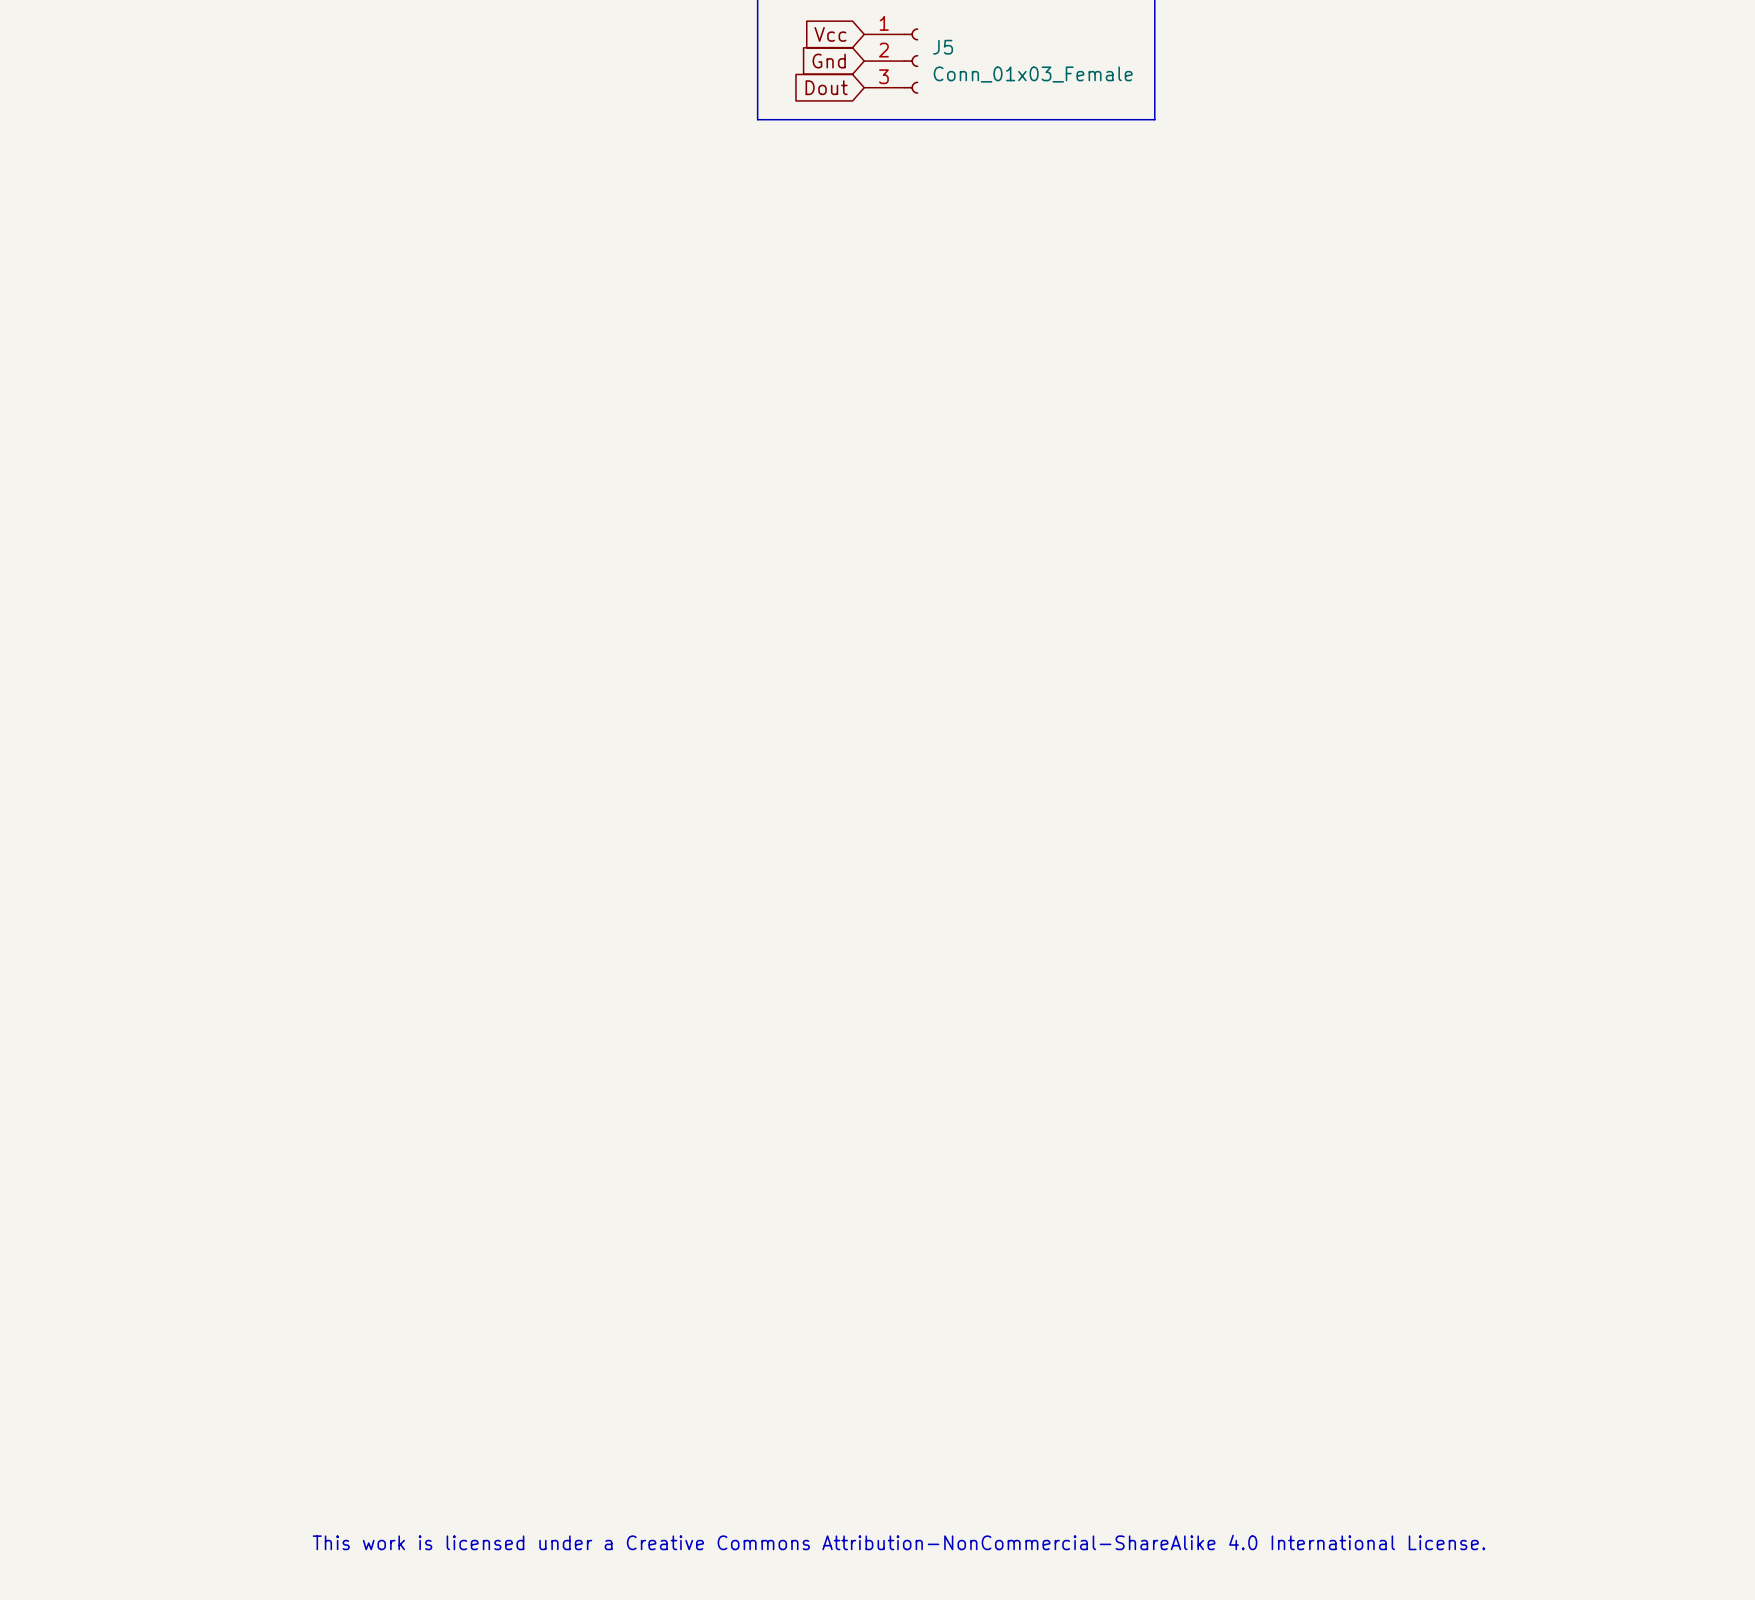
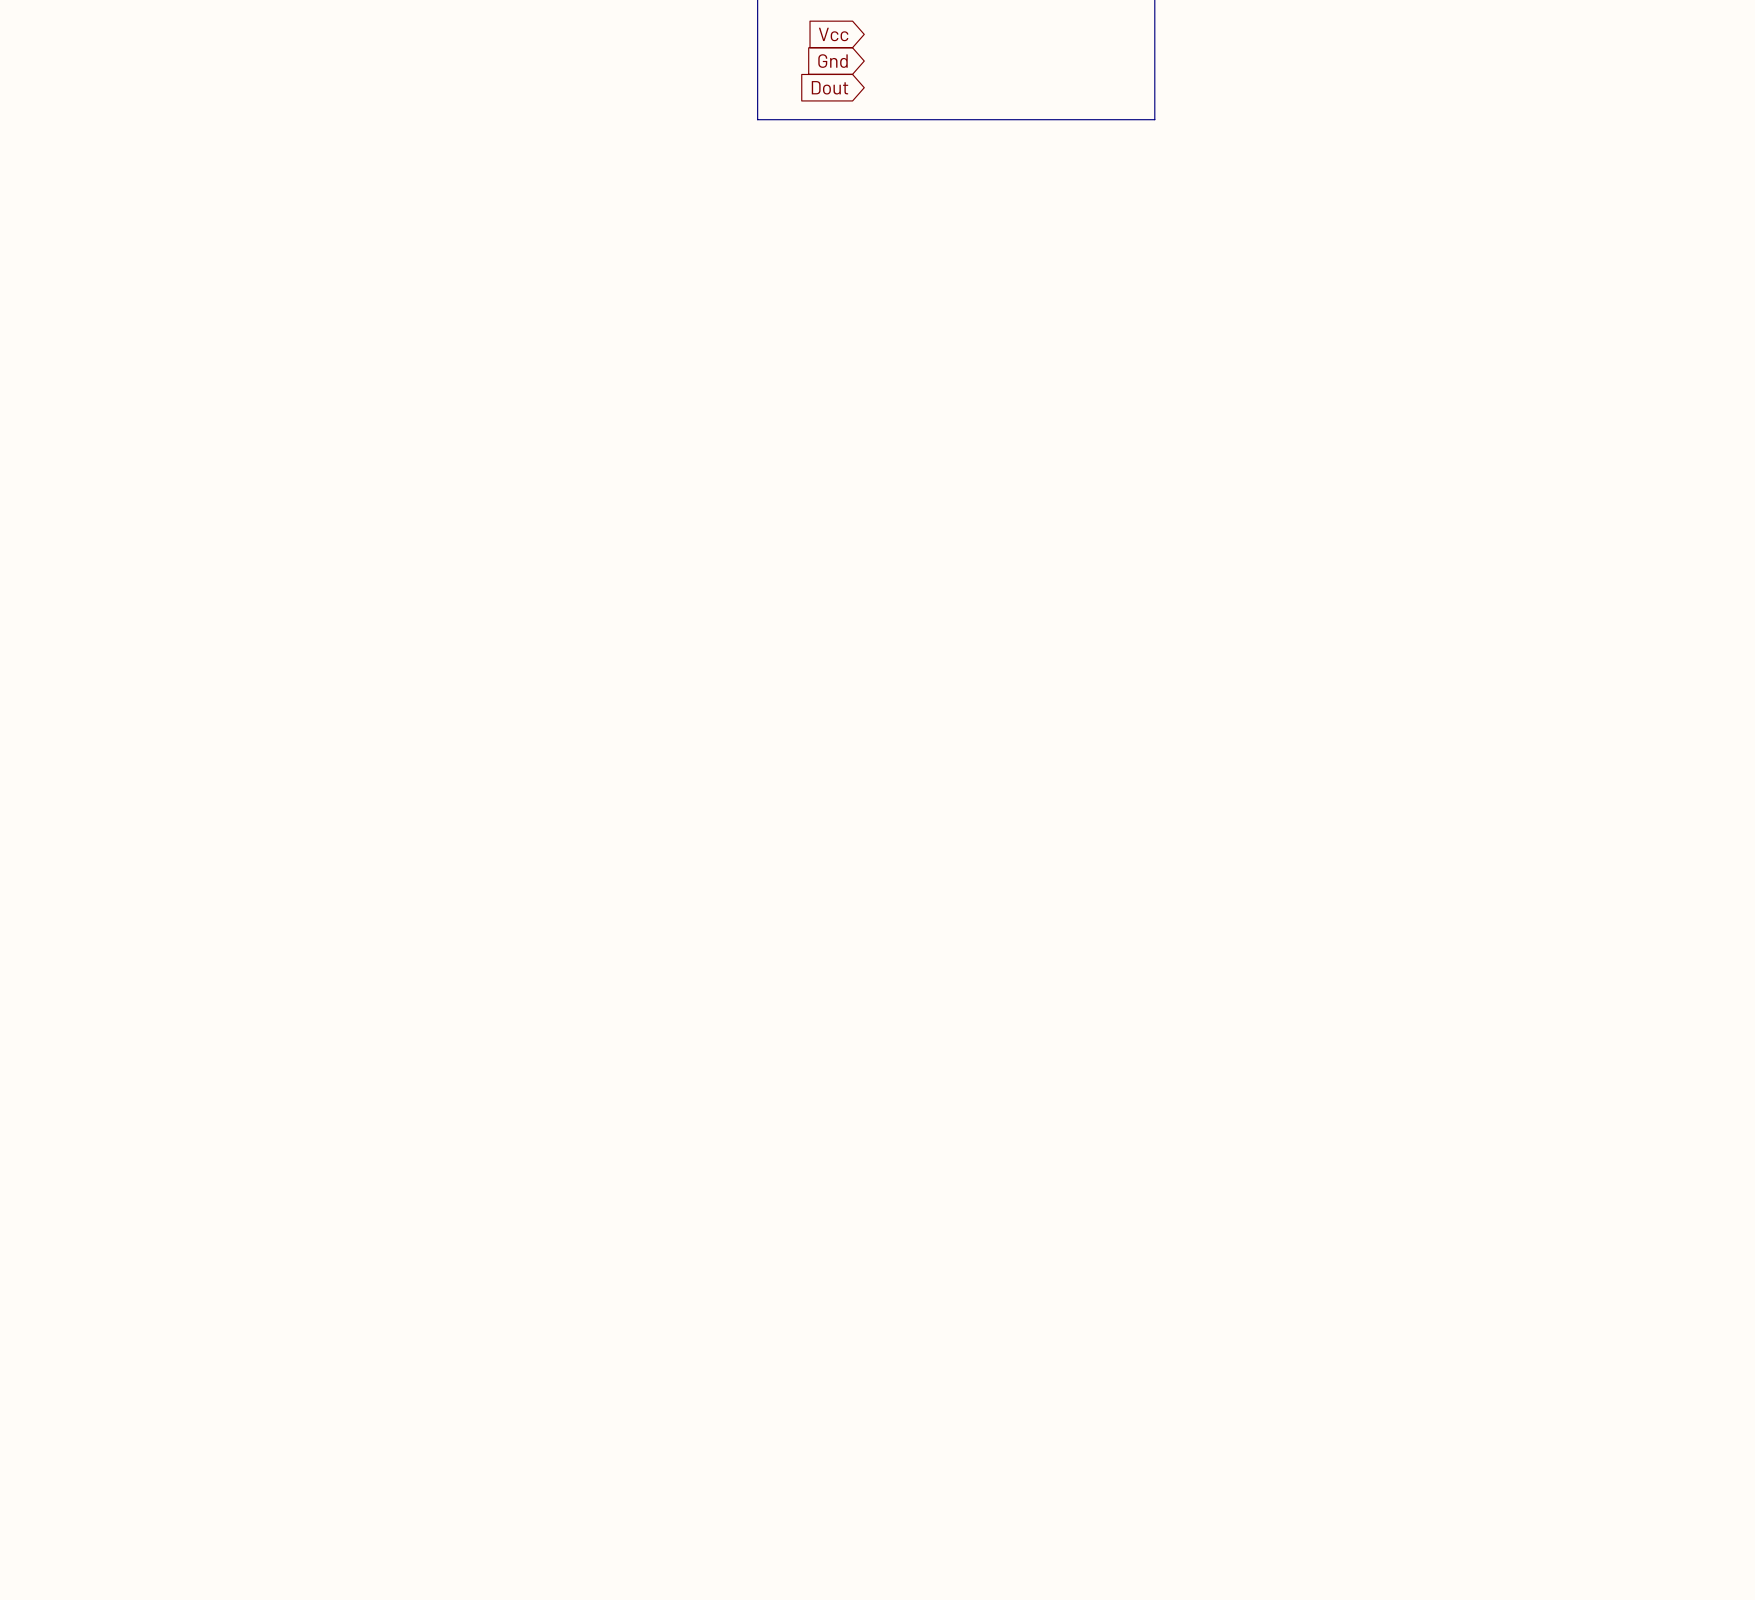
J5: Conn_01x03_Female (891, 61) -> none
text: This work is licensed under a Creative Commons Attribution-NonCommercial-ShareAlike 4.0 International License. (898, 1542) -> none

